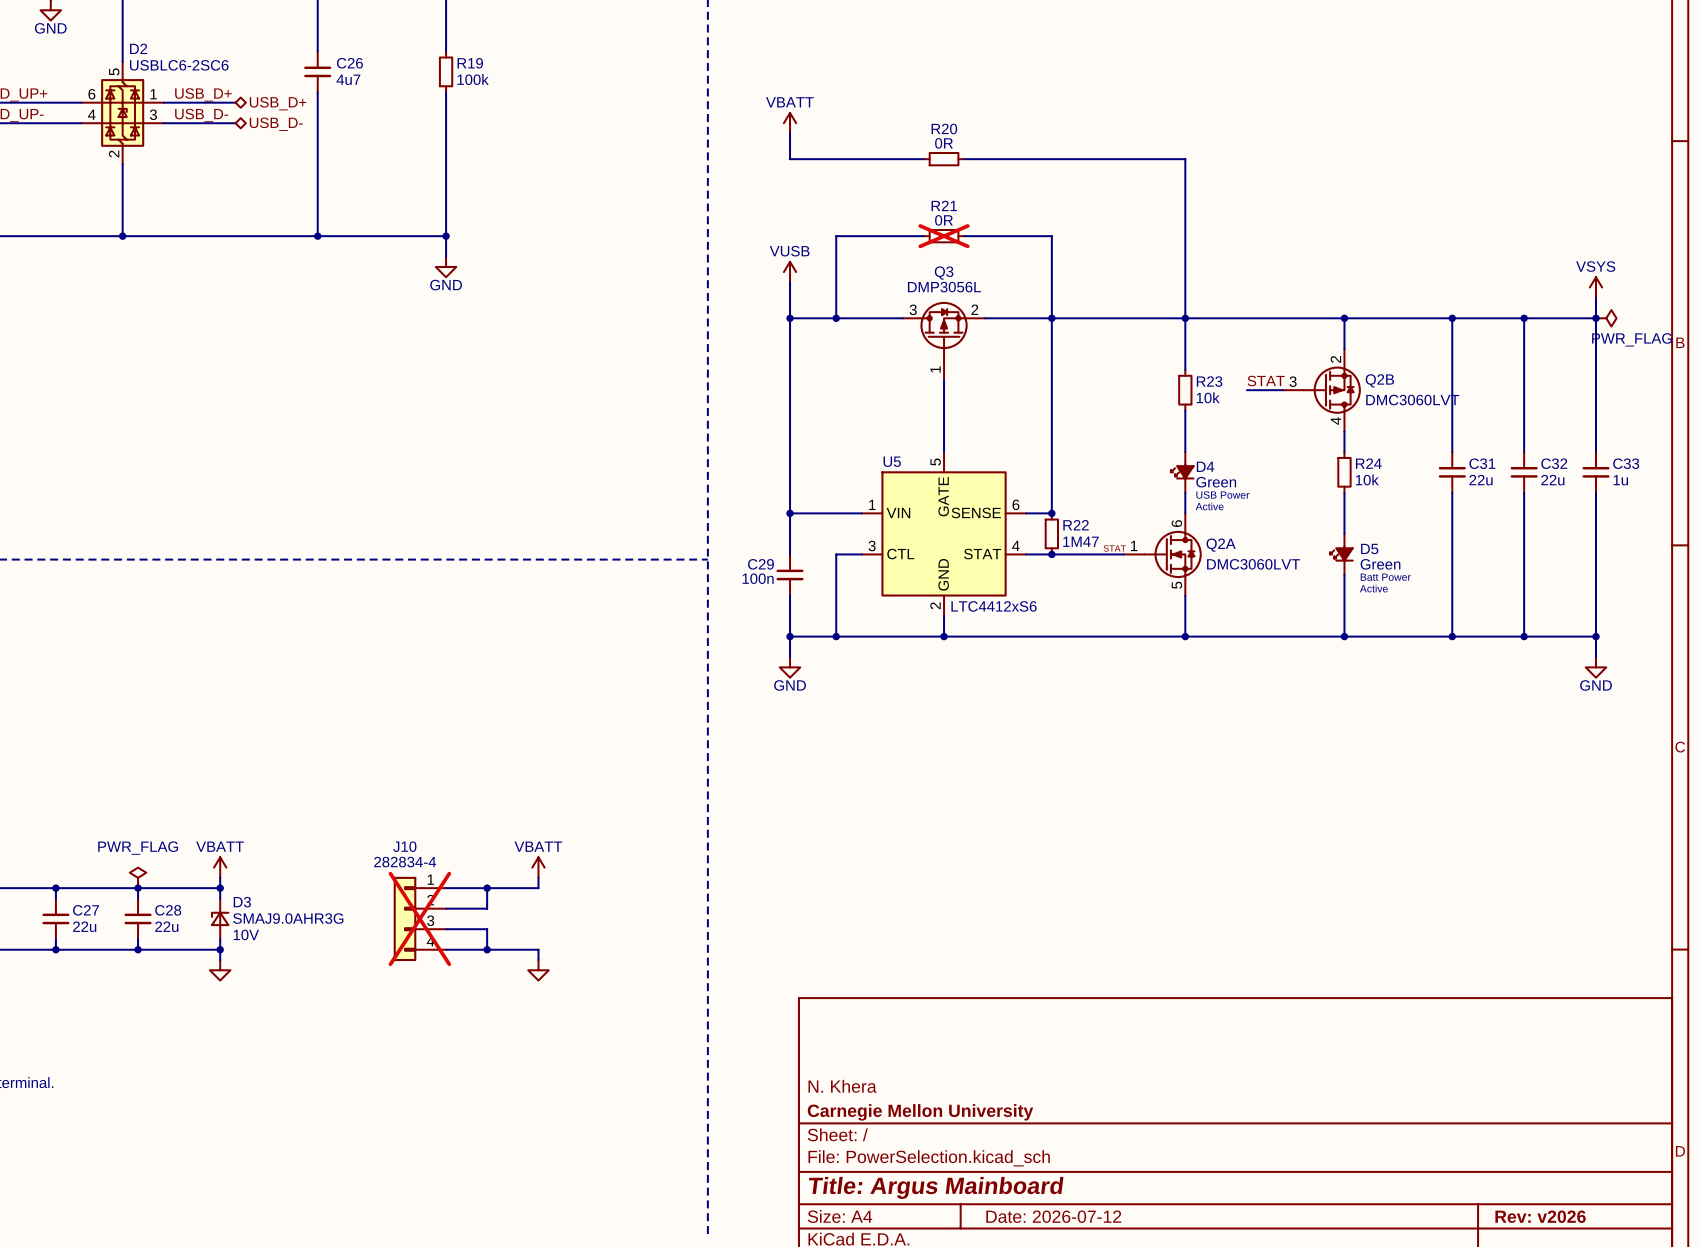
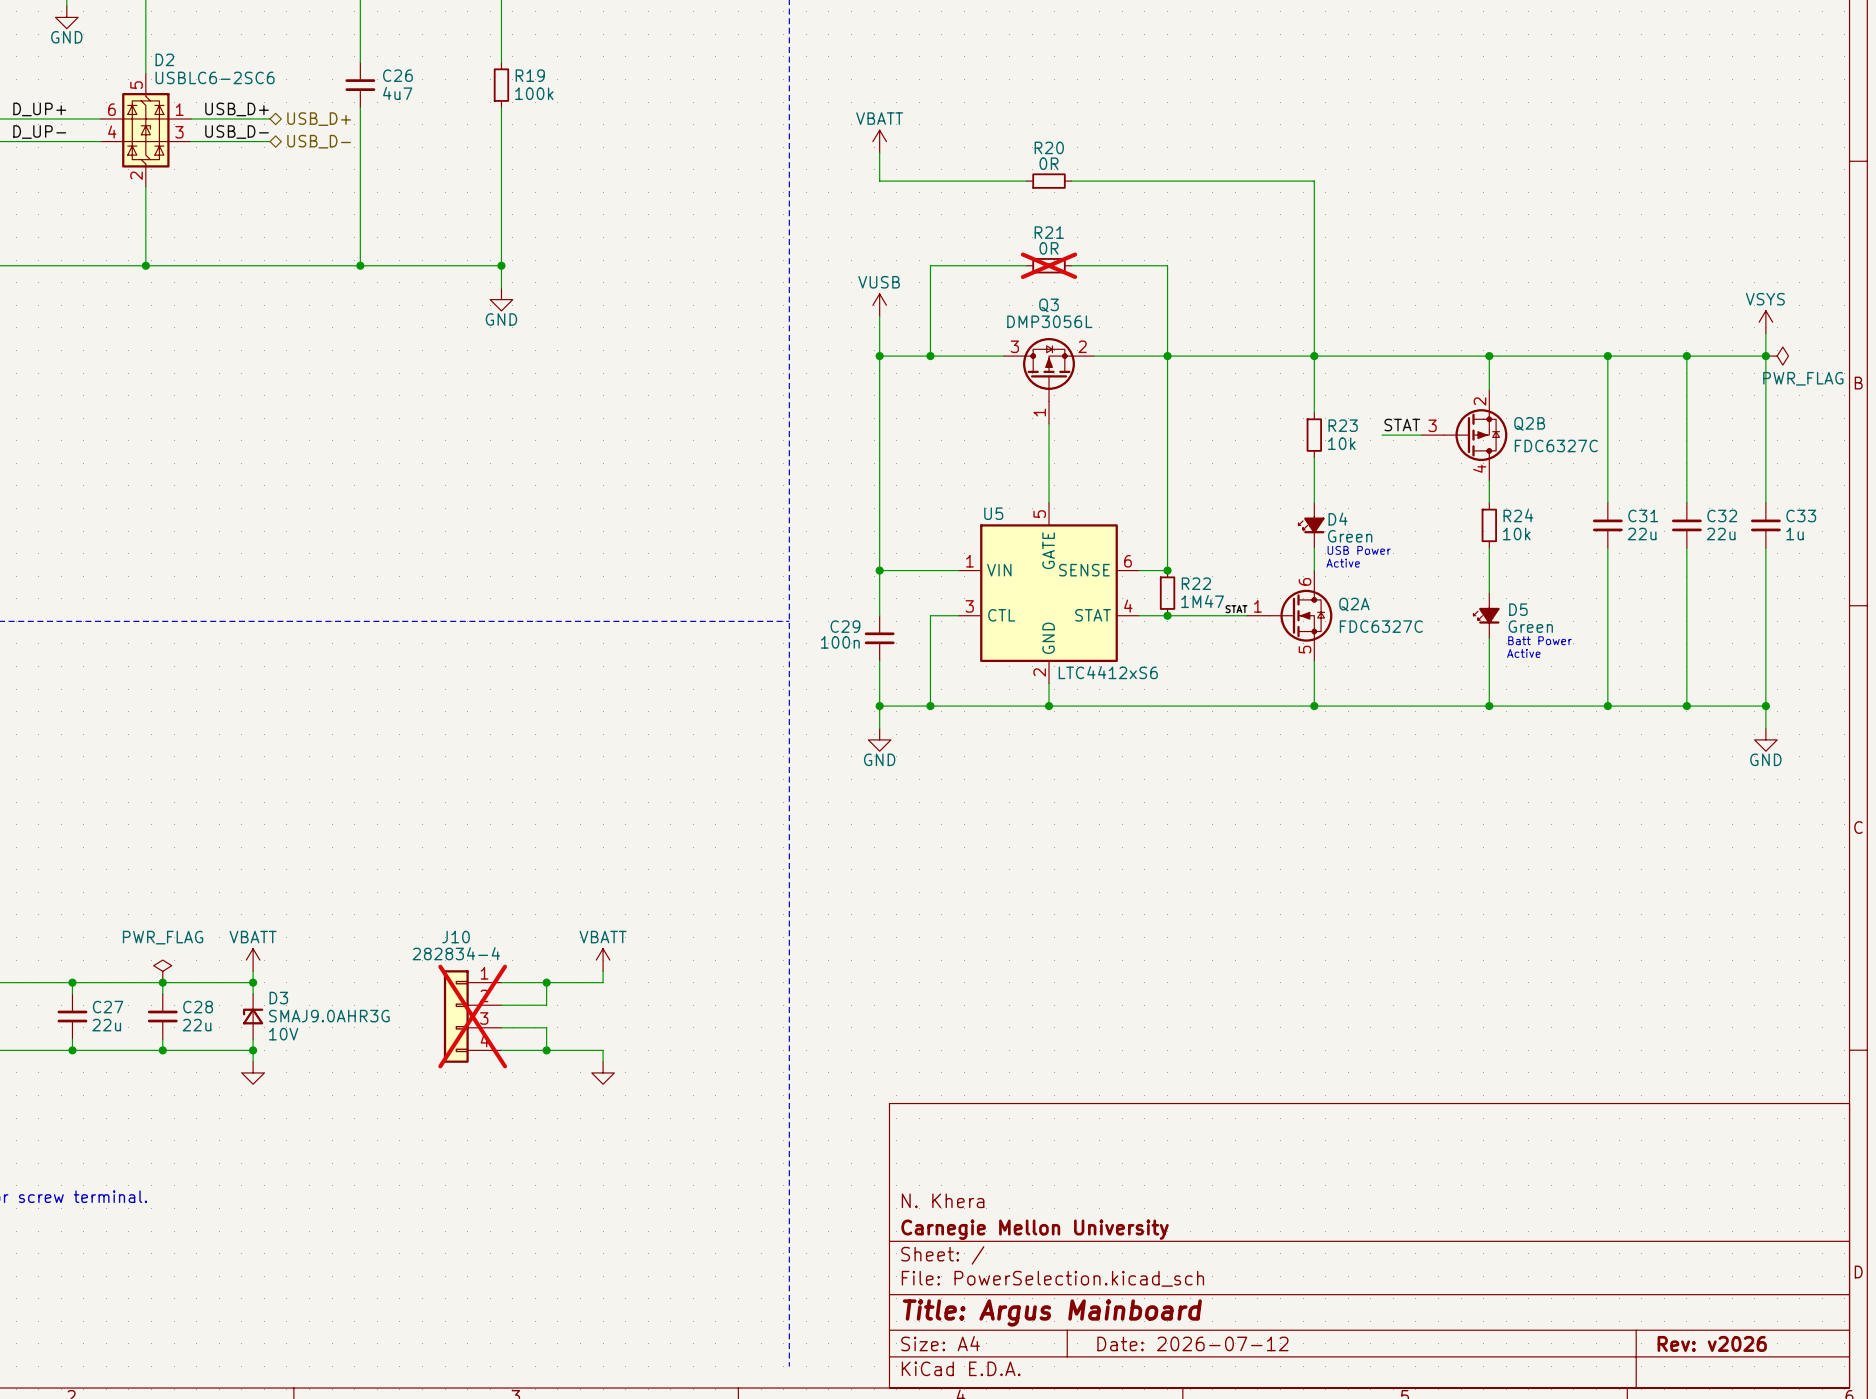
Q2B value: DMC3060LVT (1412, 400) -> FDC6327C (1556, 445)
Q2A value: DMC3060LVT (1253, 564) -> FDC6327C (1381, 626)

